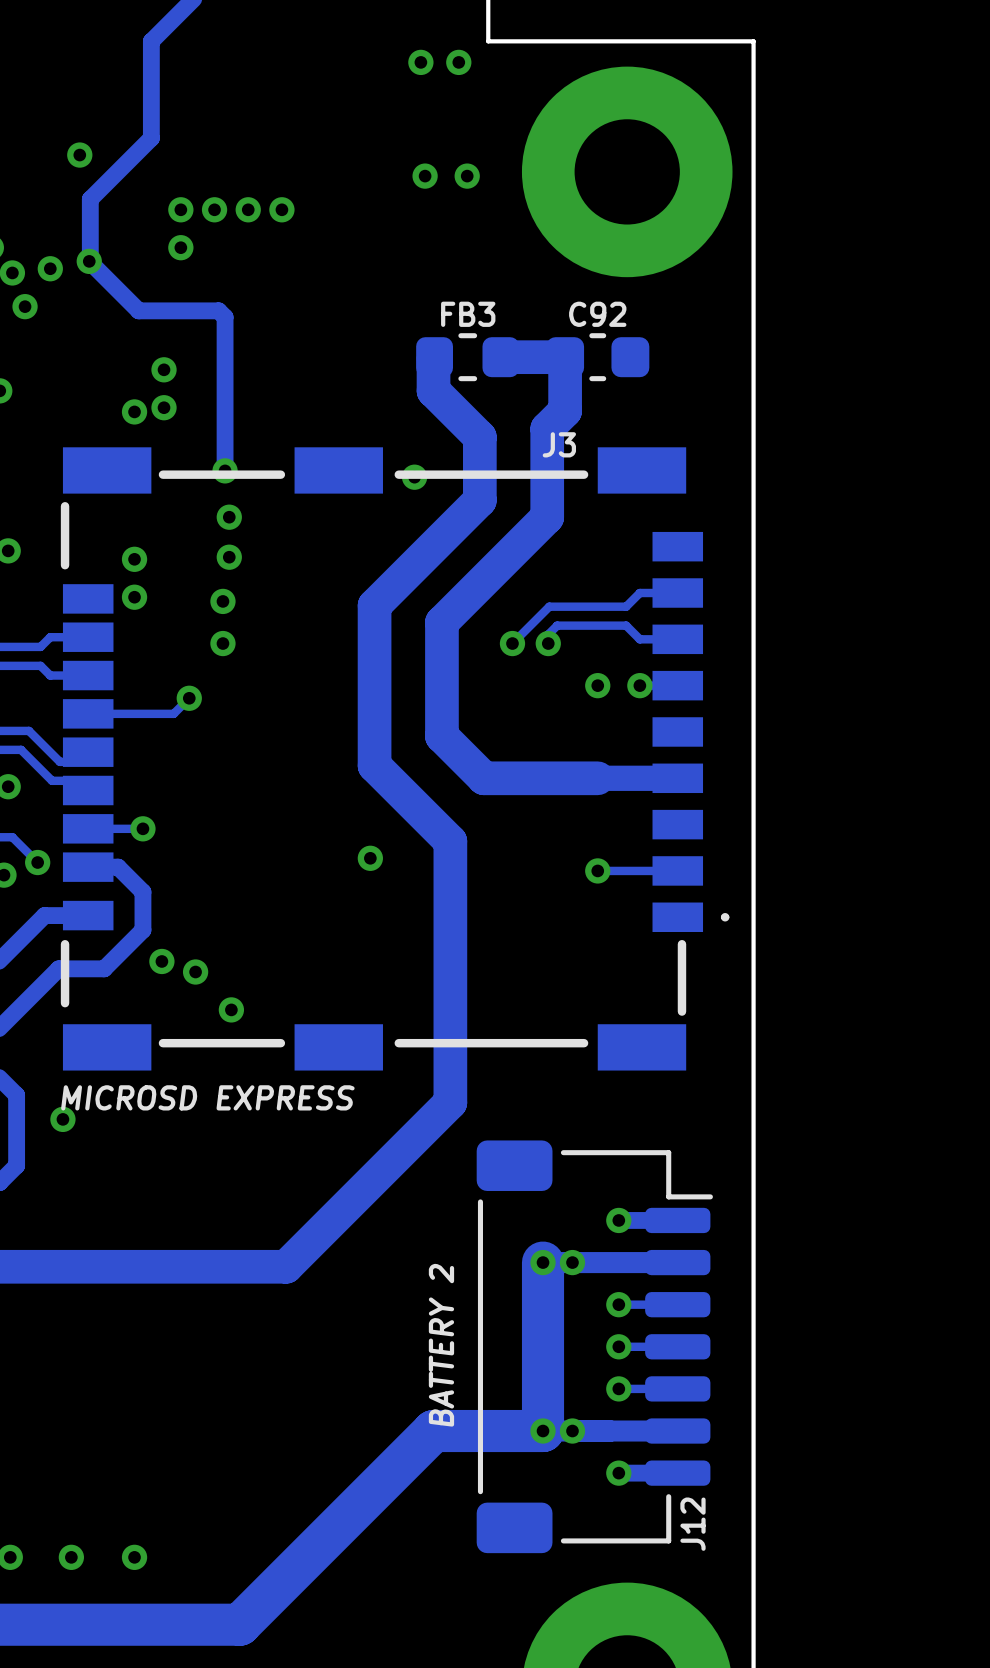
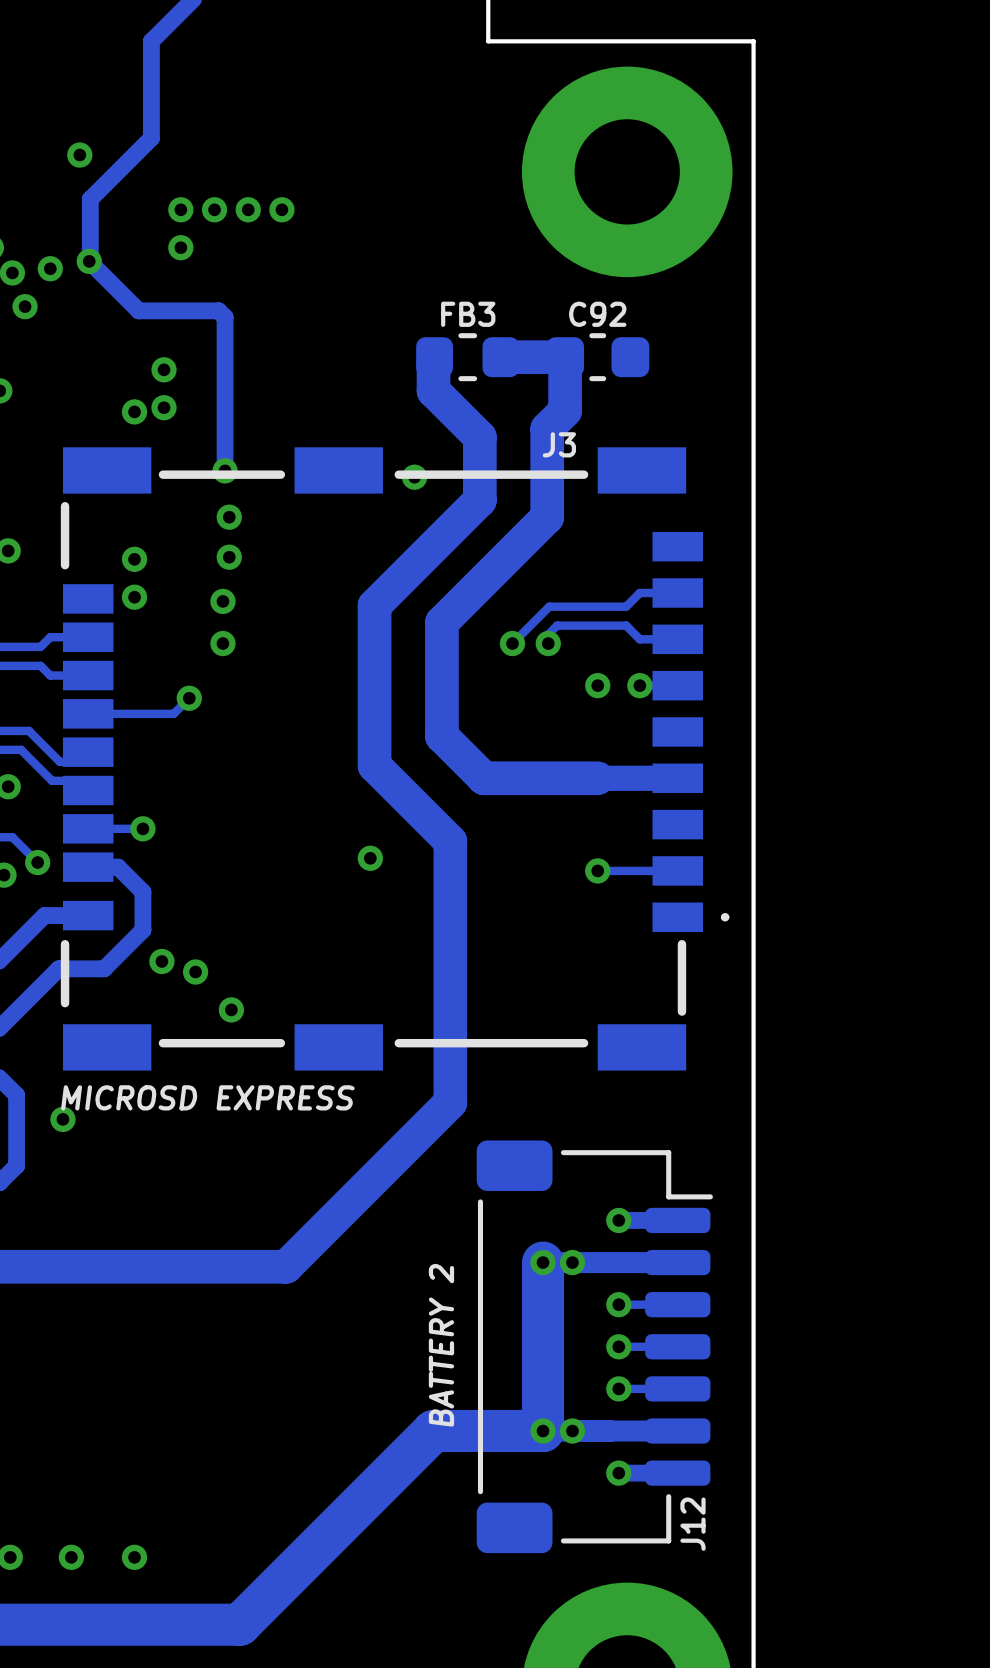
via: (420, 62) -> none
via: (458, 62) -> none
via: (425, 176) -> none
via: (467, 176) -> none

